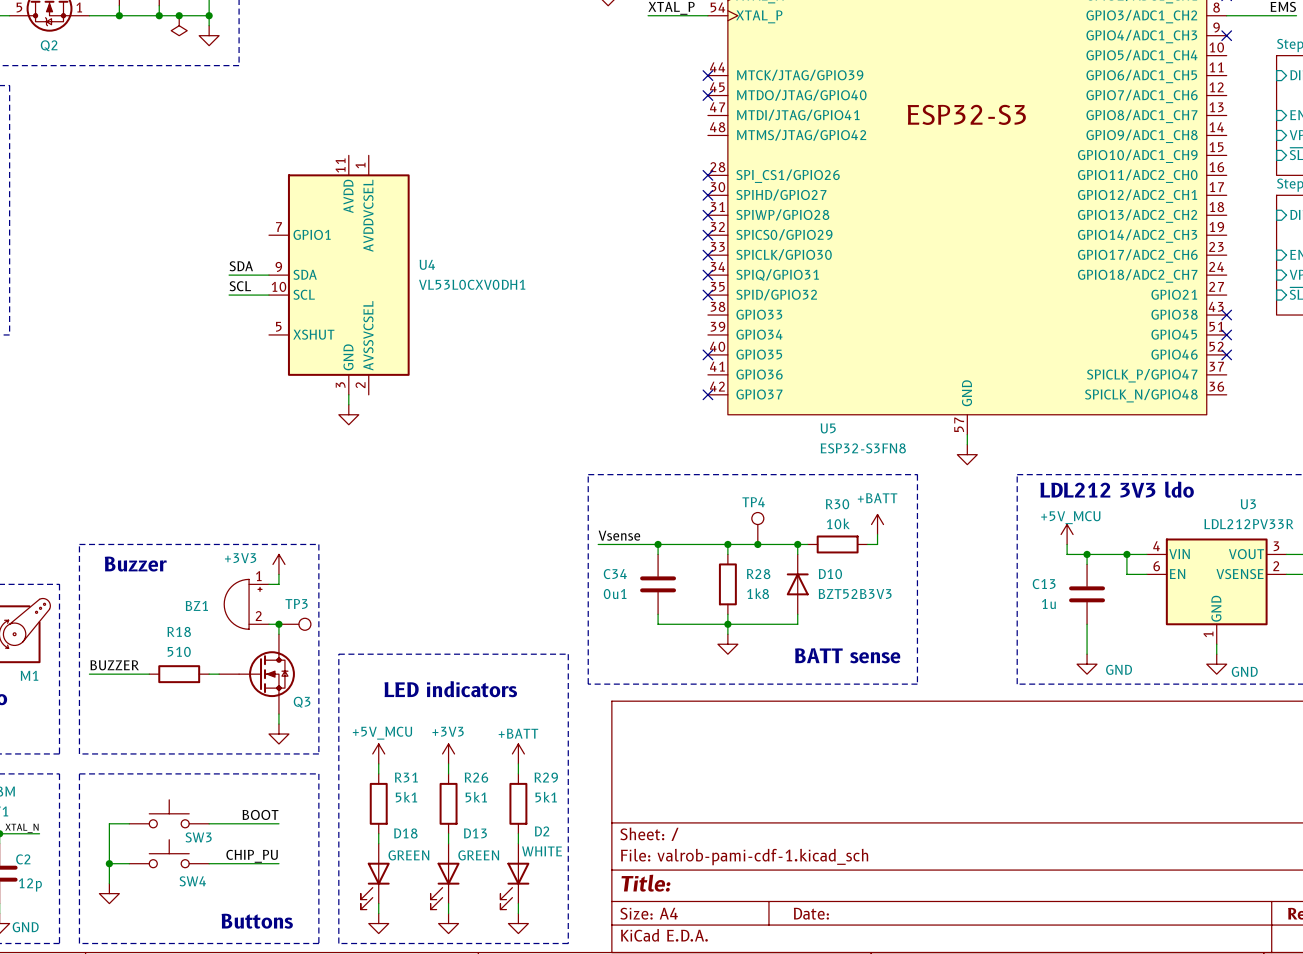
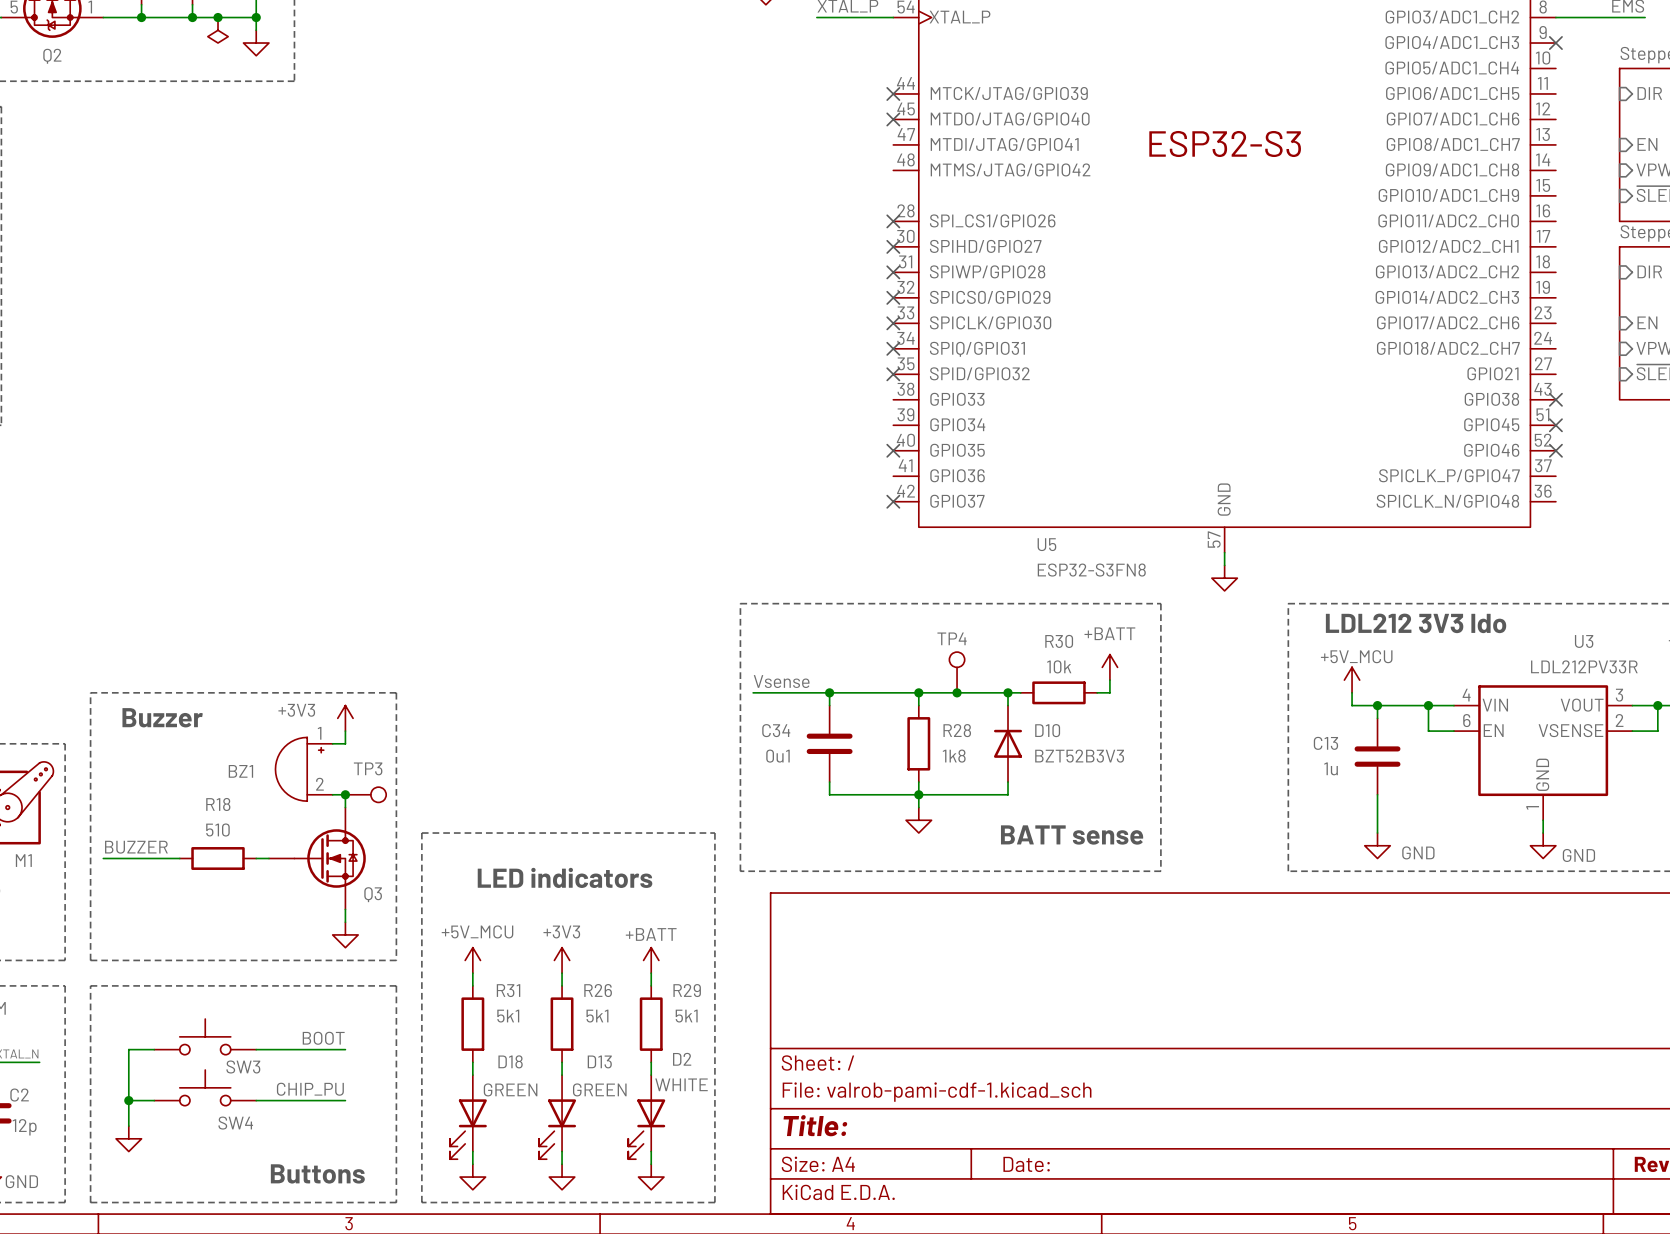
label: SDA (241, 266) -> none
wire: (229, 275) (268, 275) -> none
U4: VL53L0CXV0DH1 (339, 275) -> none
label: SCL (240, 286) -> none
wire: (229, 295) (268, 295) -> none
wire: (348, 394) (348, 404) -> none
power symbol: (348, 414) -> none

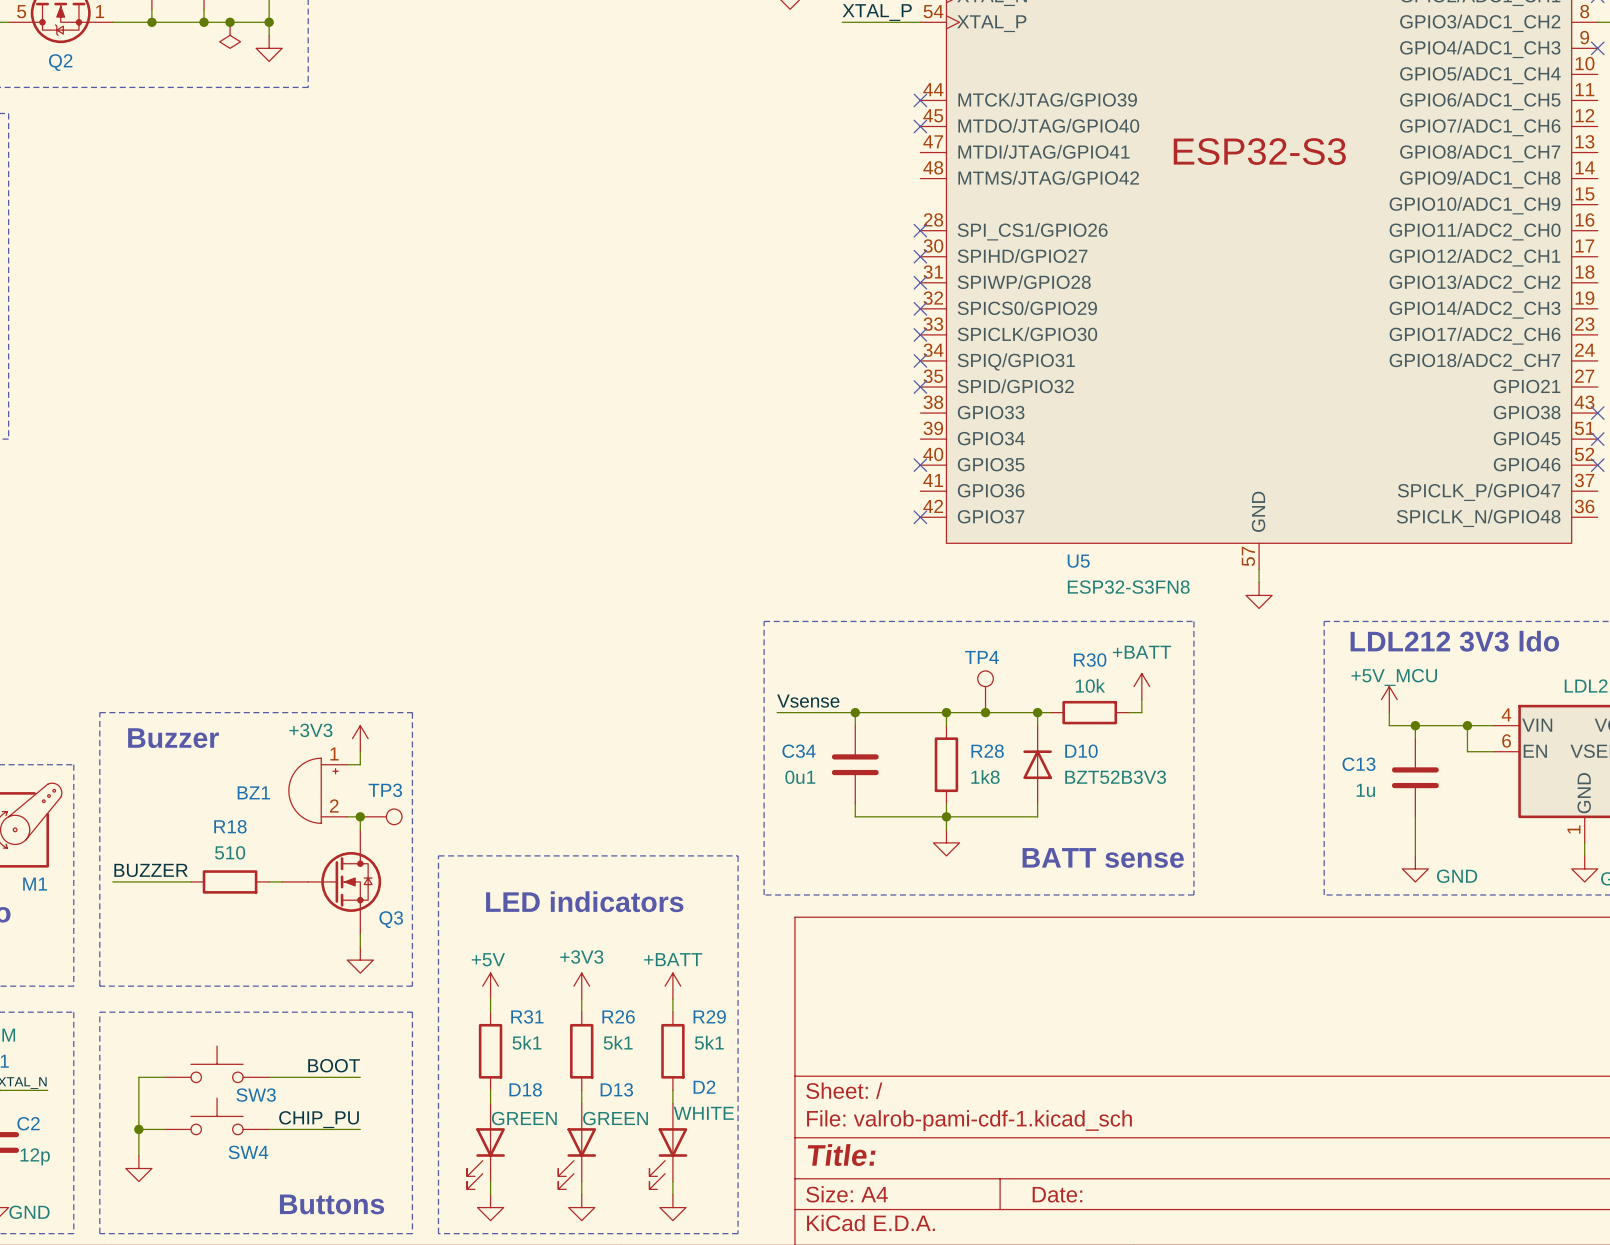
power symbol: +5V_MCU (472, 960) -> +5V (490, 986)

